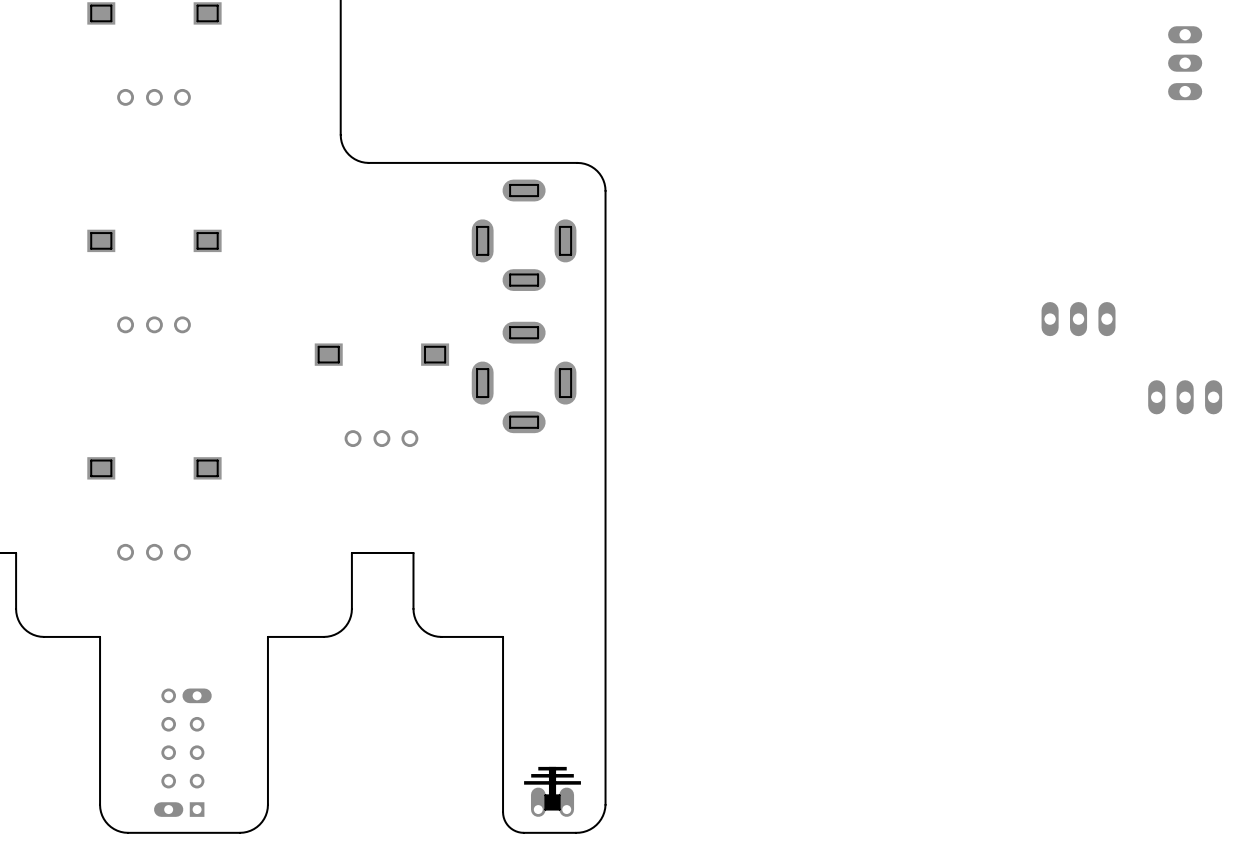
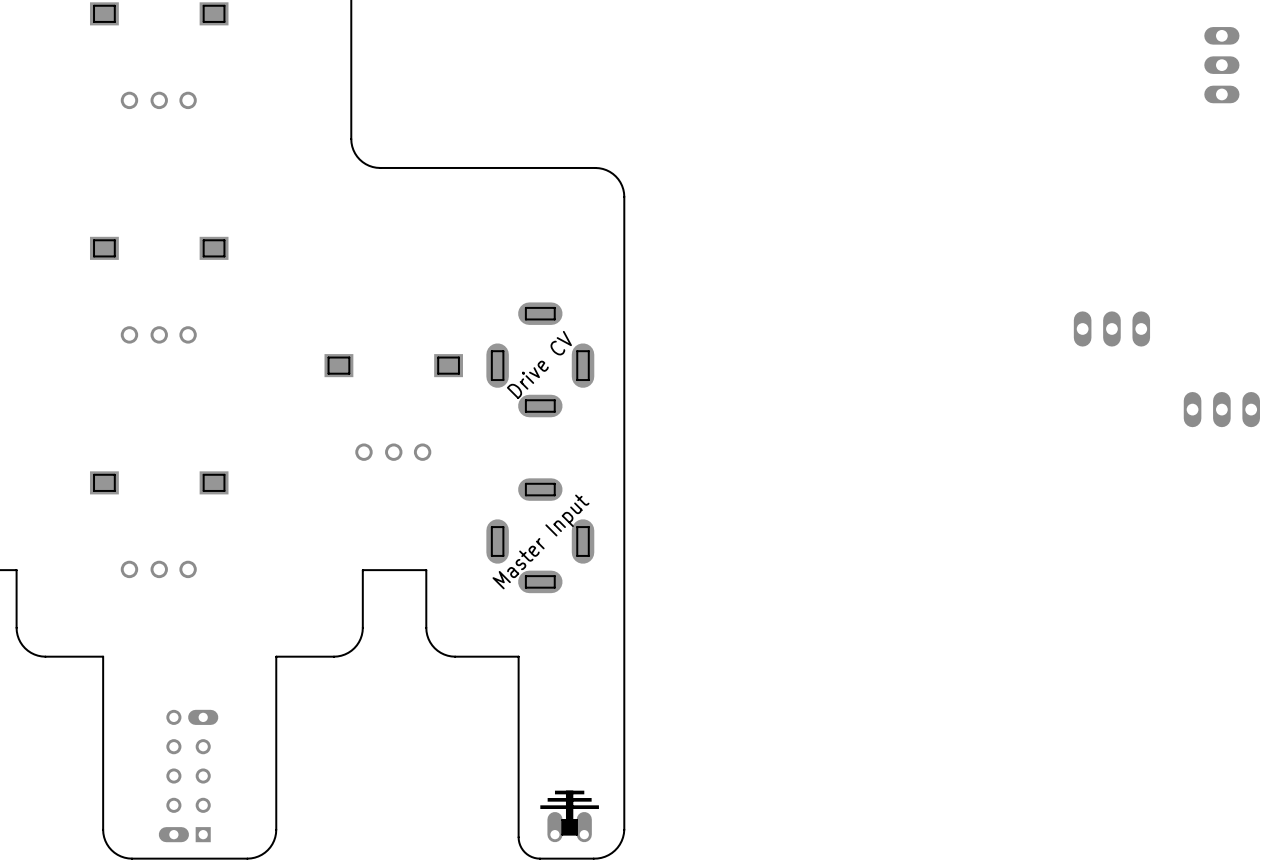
part: (524, 235) -> none
part: none -> (540, 359)
part: (524, 377) -> none
part: none -> (540, 535)

